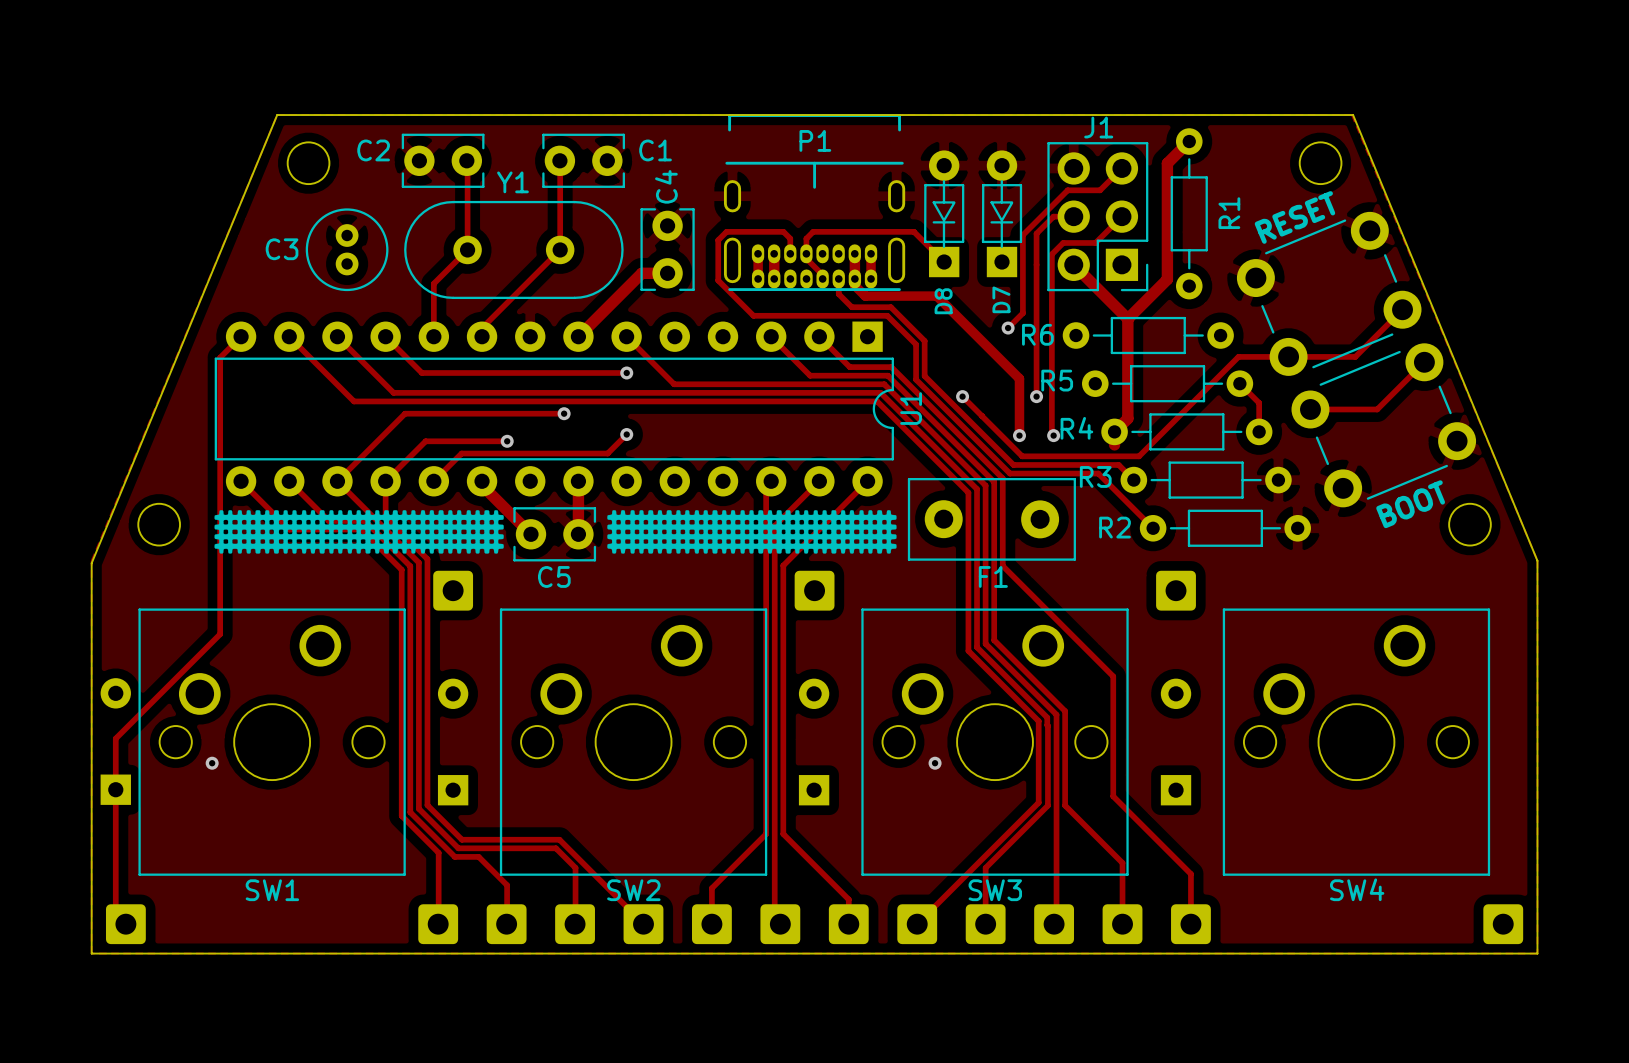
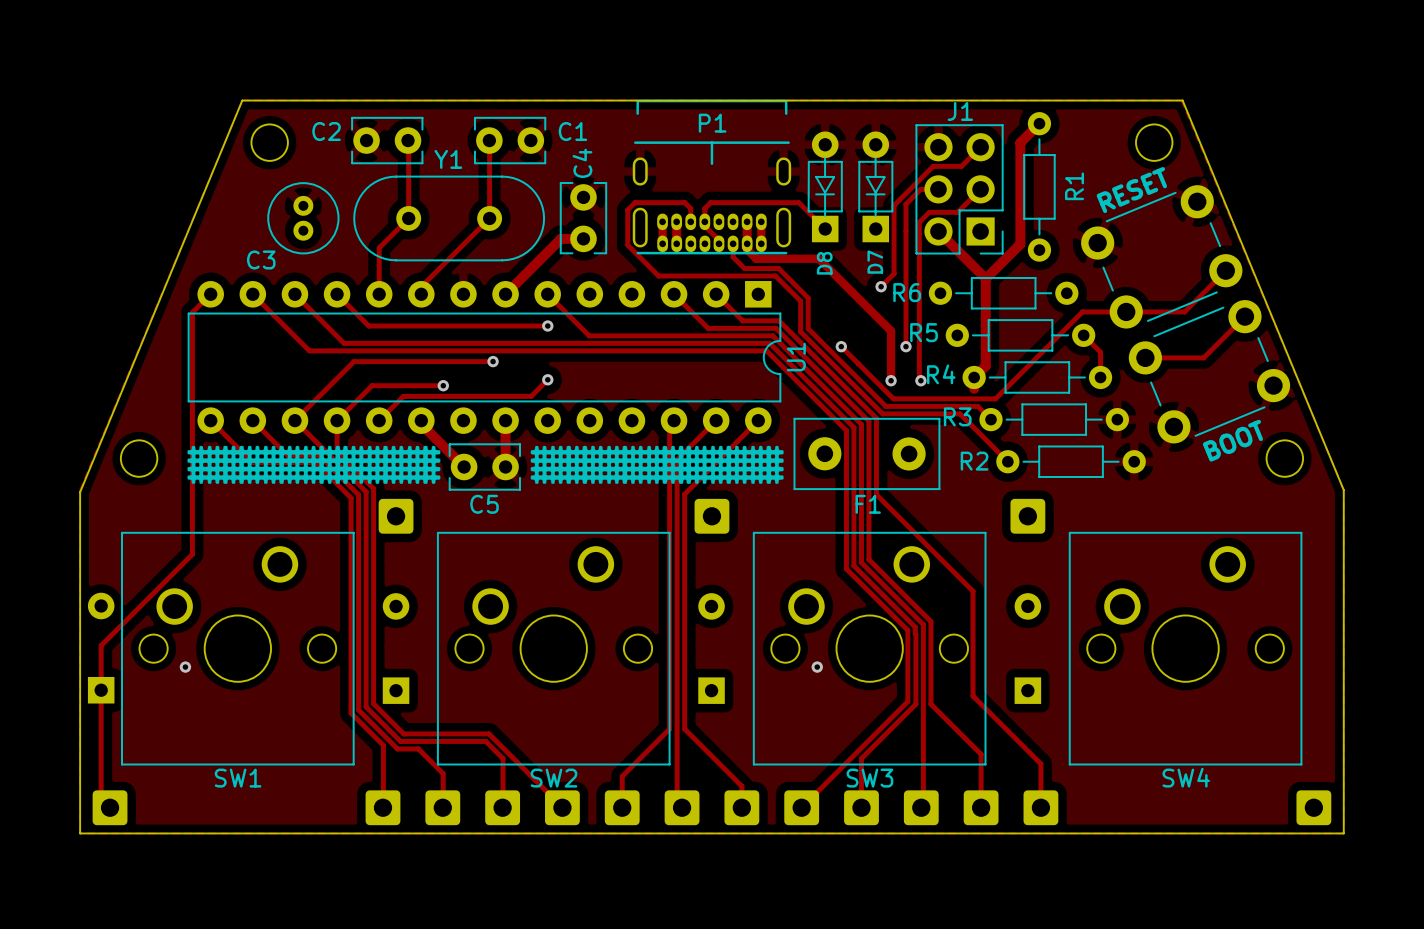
C3 name position: C3 (282, 249) -> C3 (261, 259)

